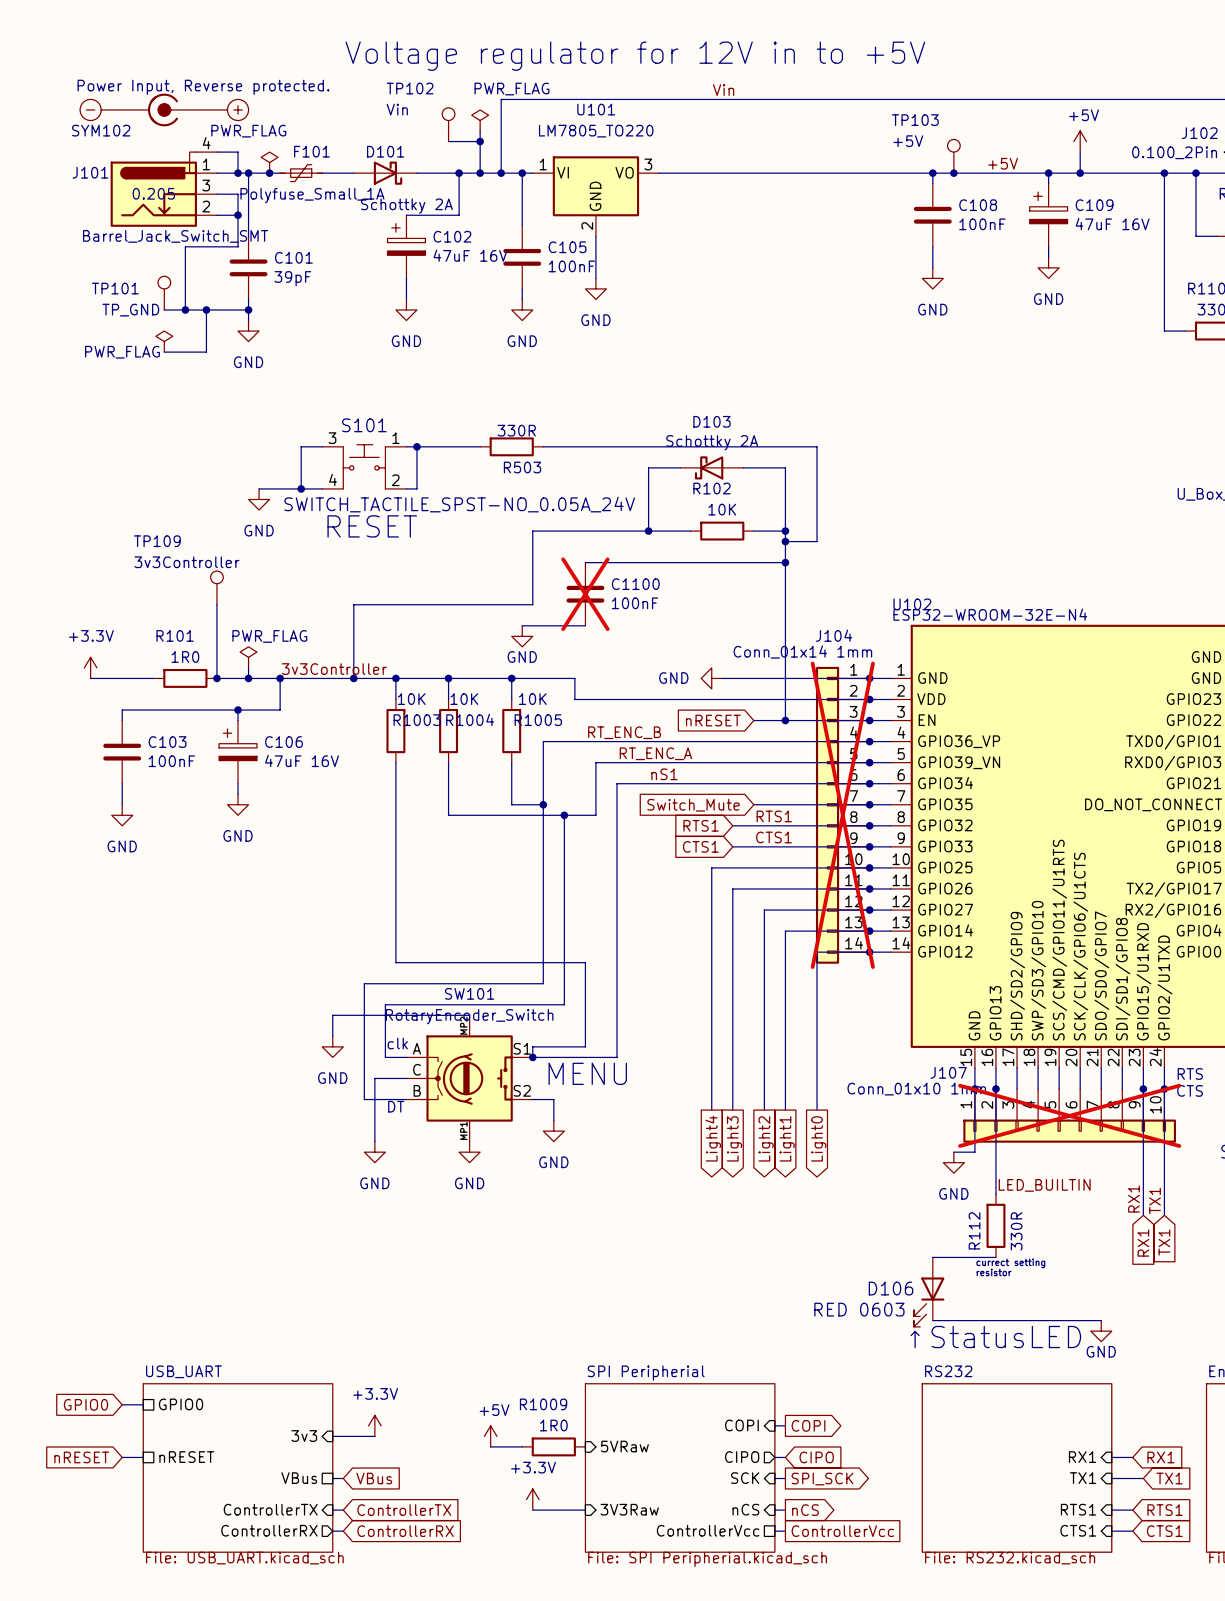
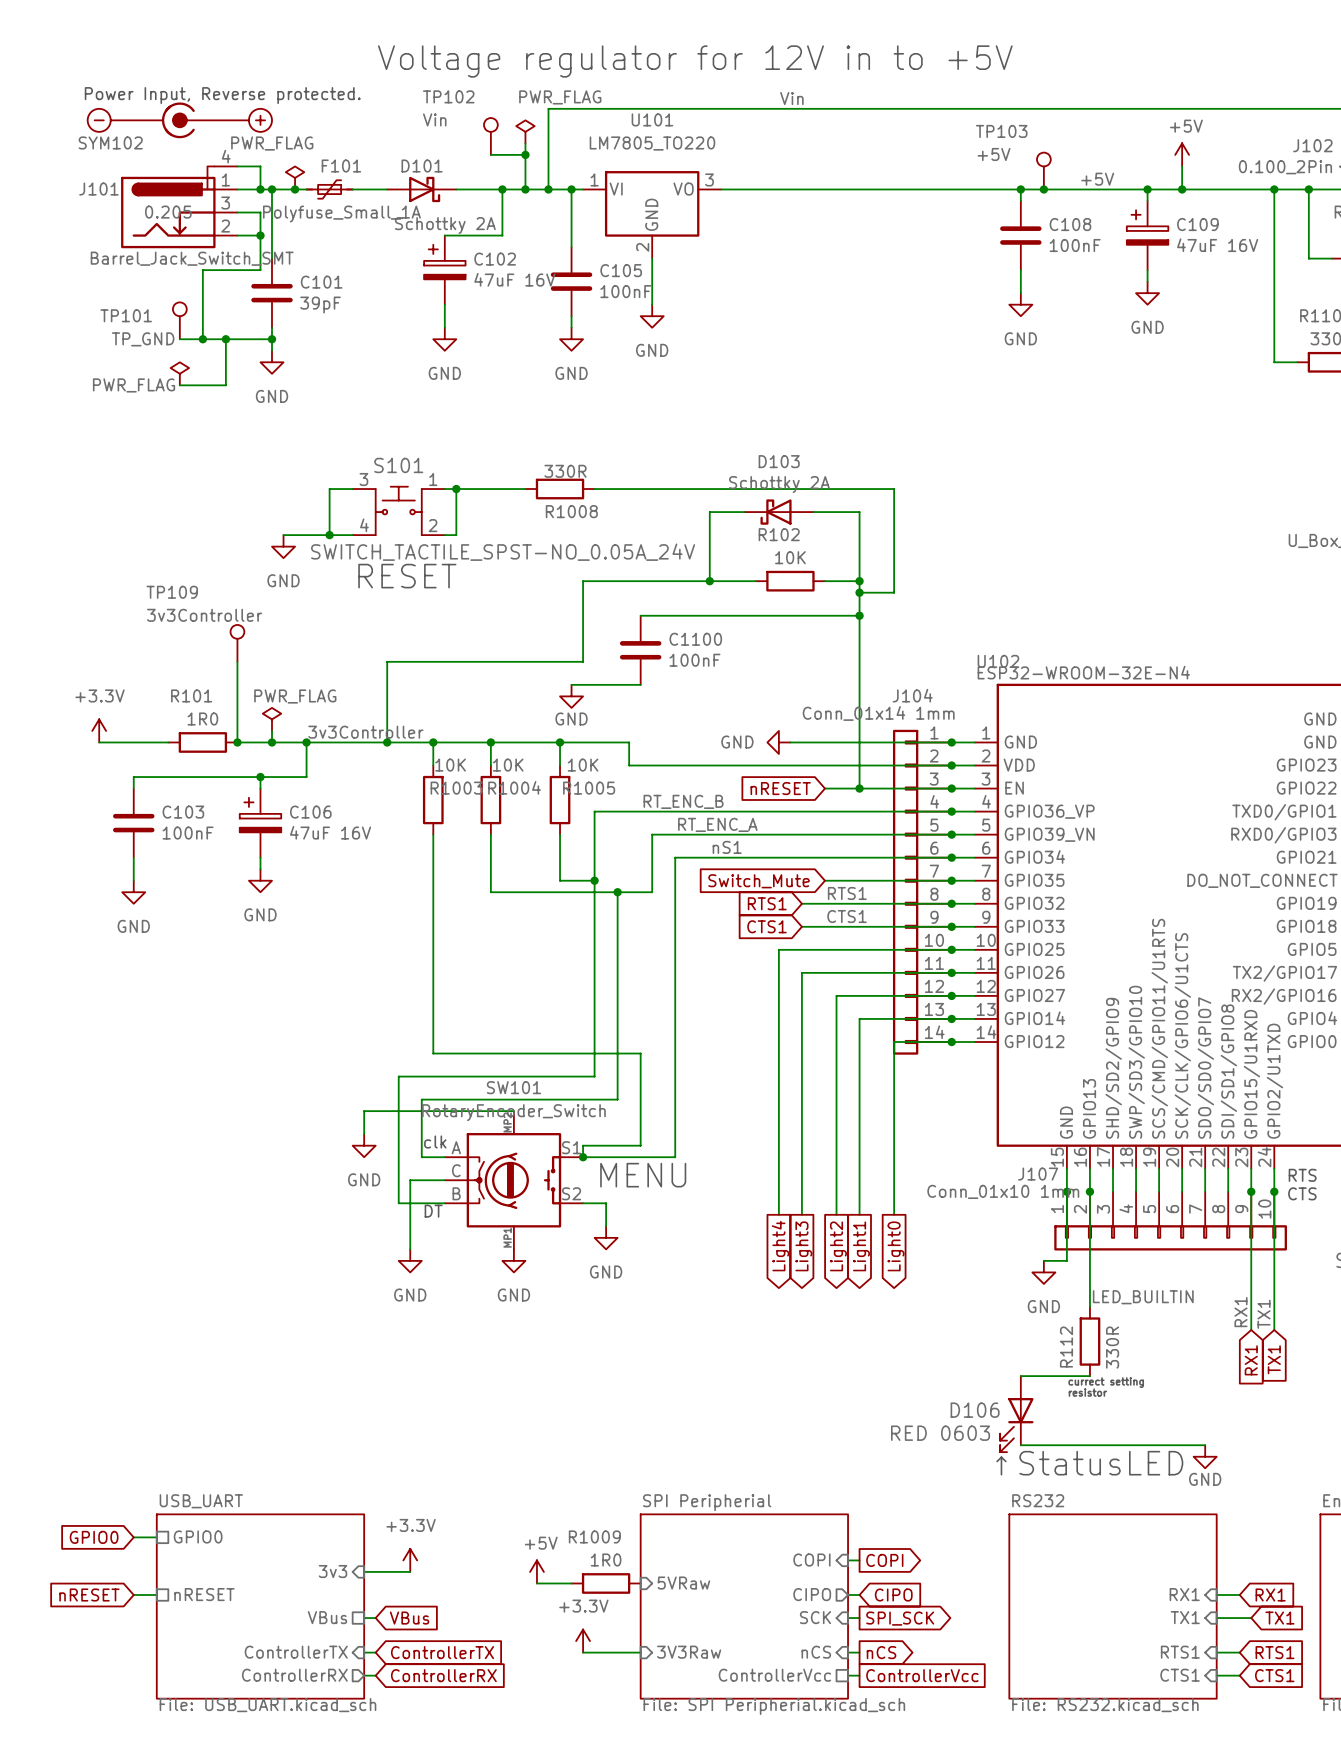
R503 name: R503 (522, 467) -> R1008 (571, 511)
C1100 do-not-place cross: (585, 594) -> none
J104 do-not-place cross: (842, 815) -> none
J107 do-not-place cross: (1069, 1115) -> none

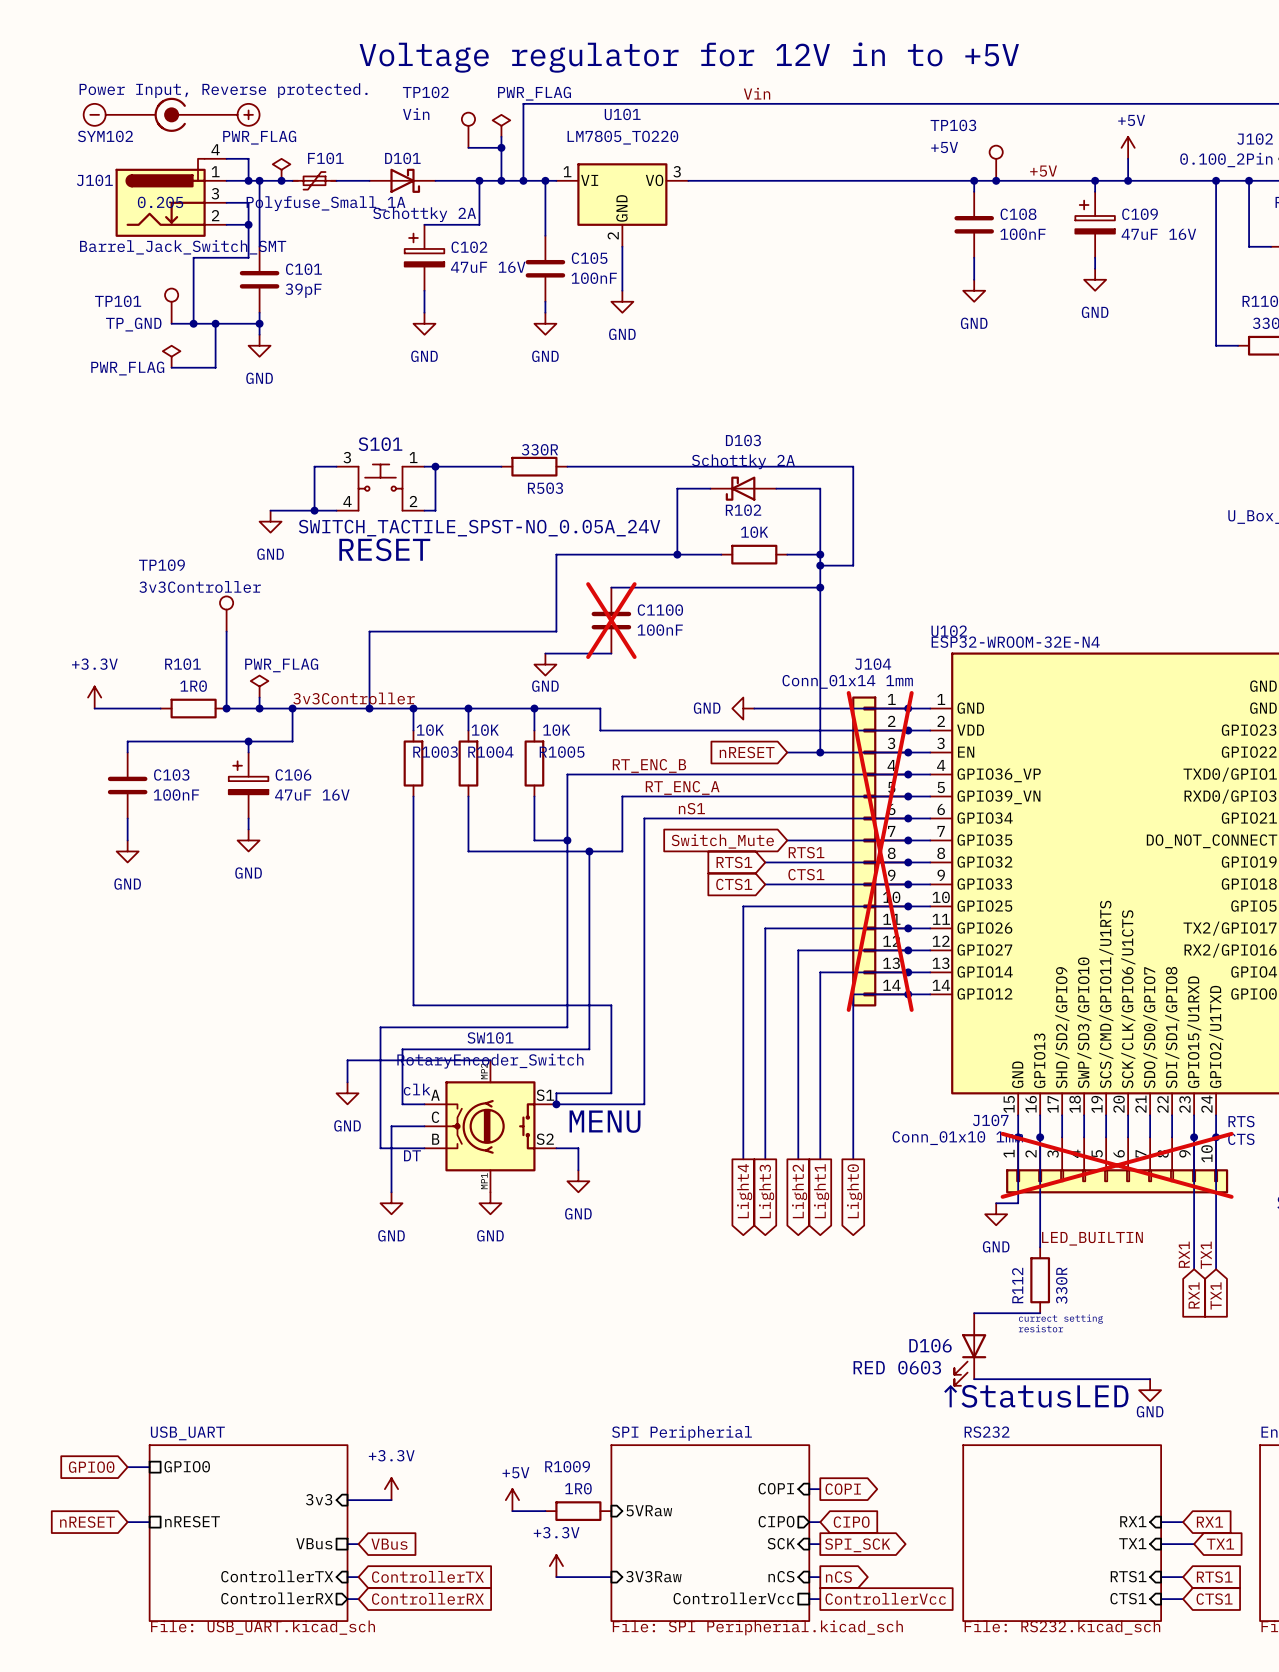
R1008 name: R1008 (571, 511) -> R503 (545, 488)
C1100 do-not-place cross: none -> (611, 620)
J104 do-not-place cross: none -> (880, 851)
J107 do-not-place cross: none -> (1117, 1165)

